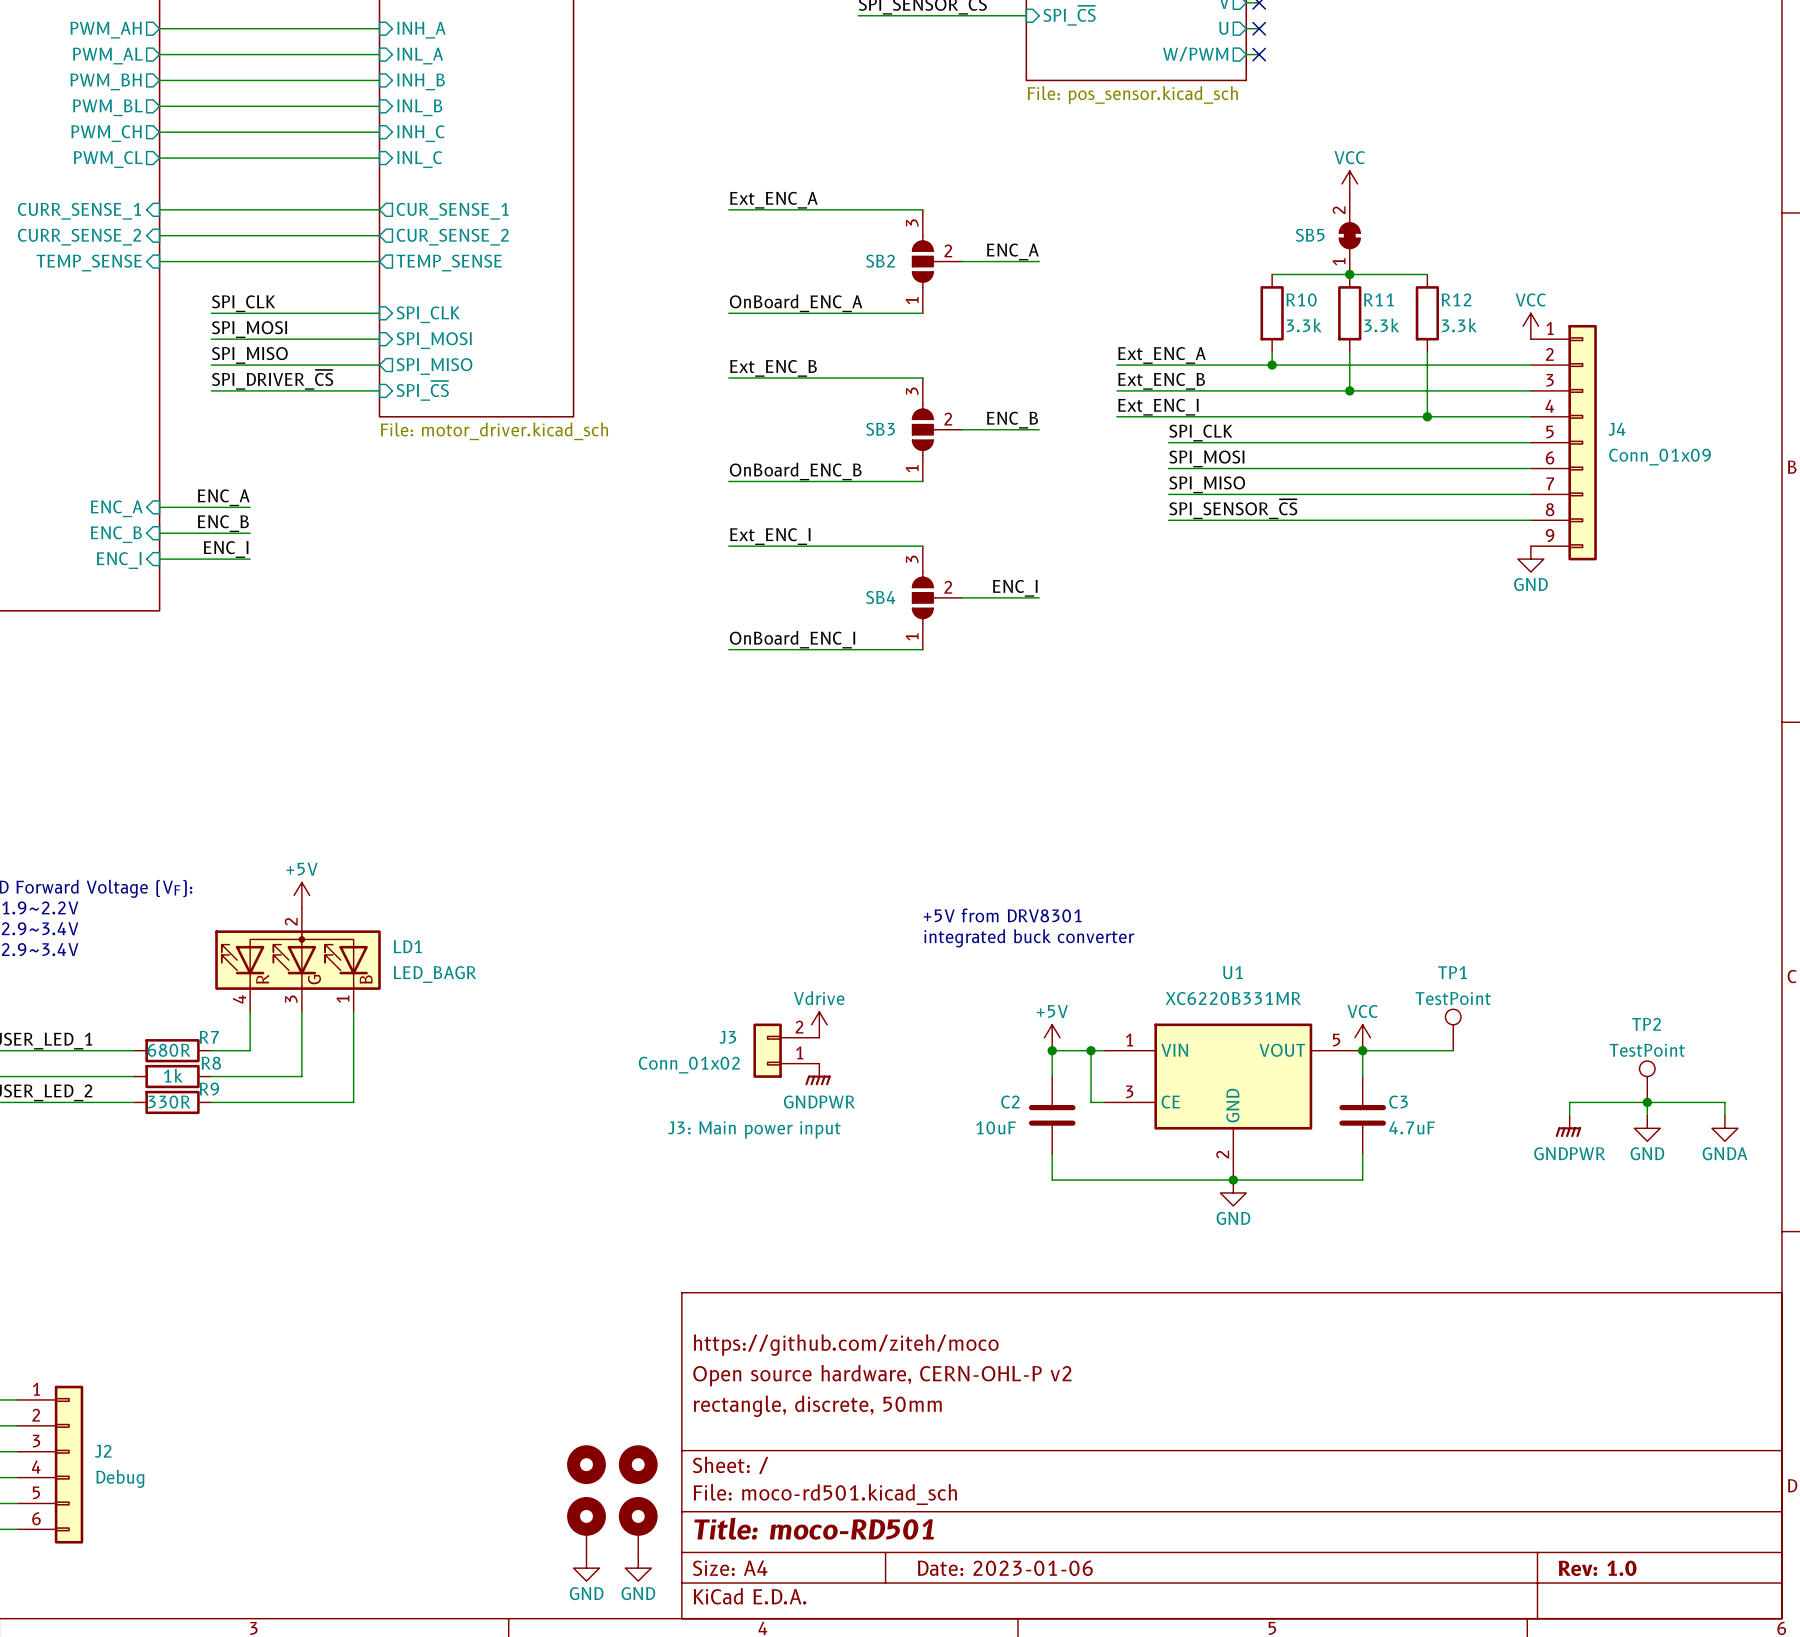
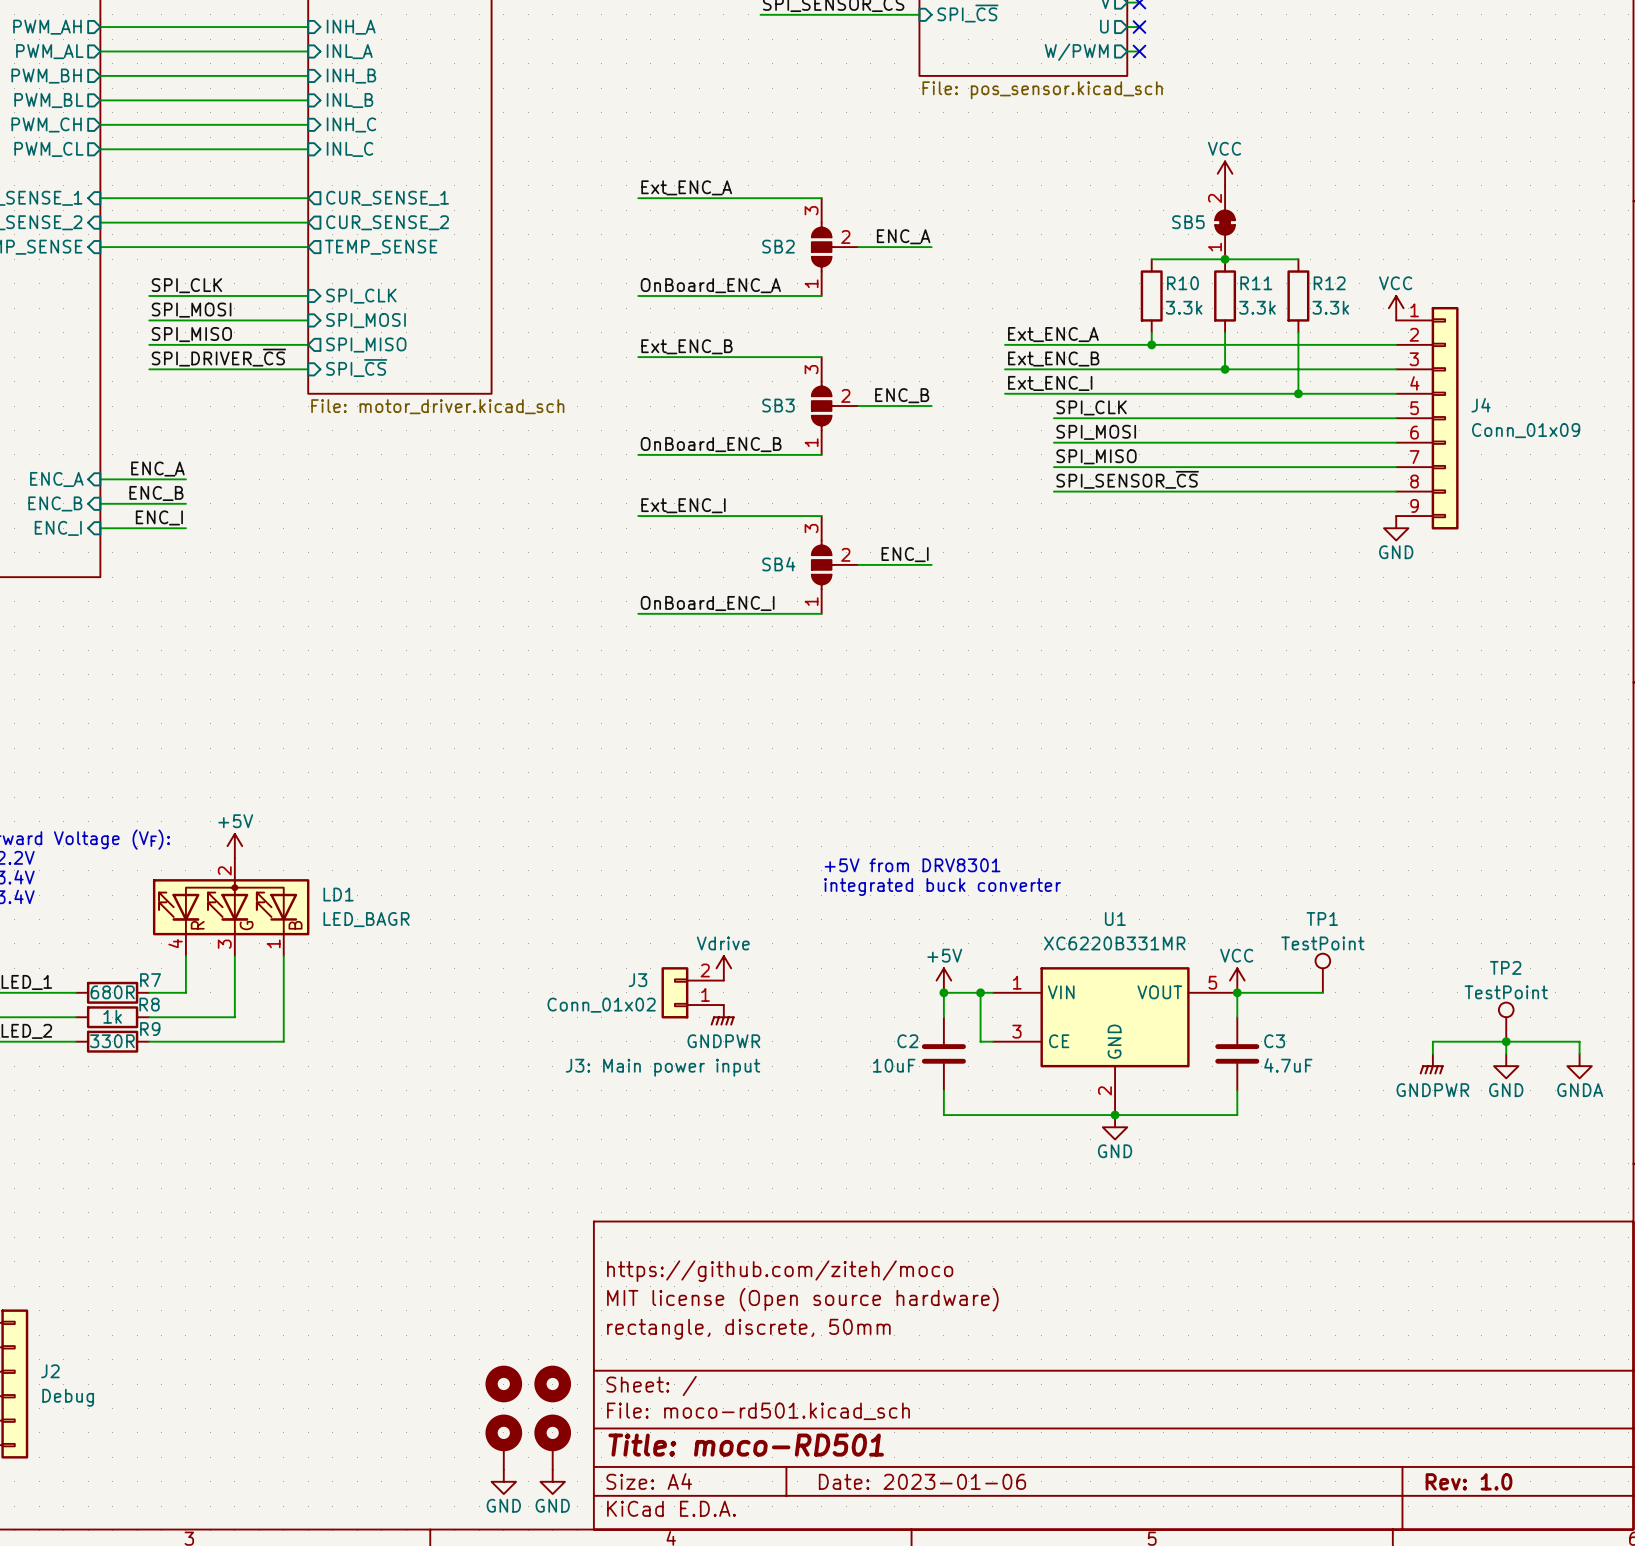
title block: Open source hardware, CERN-OHL-P v2 (882, 1375) -> MIT license (Open source hardware) (802, 1299)

